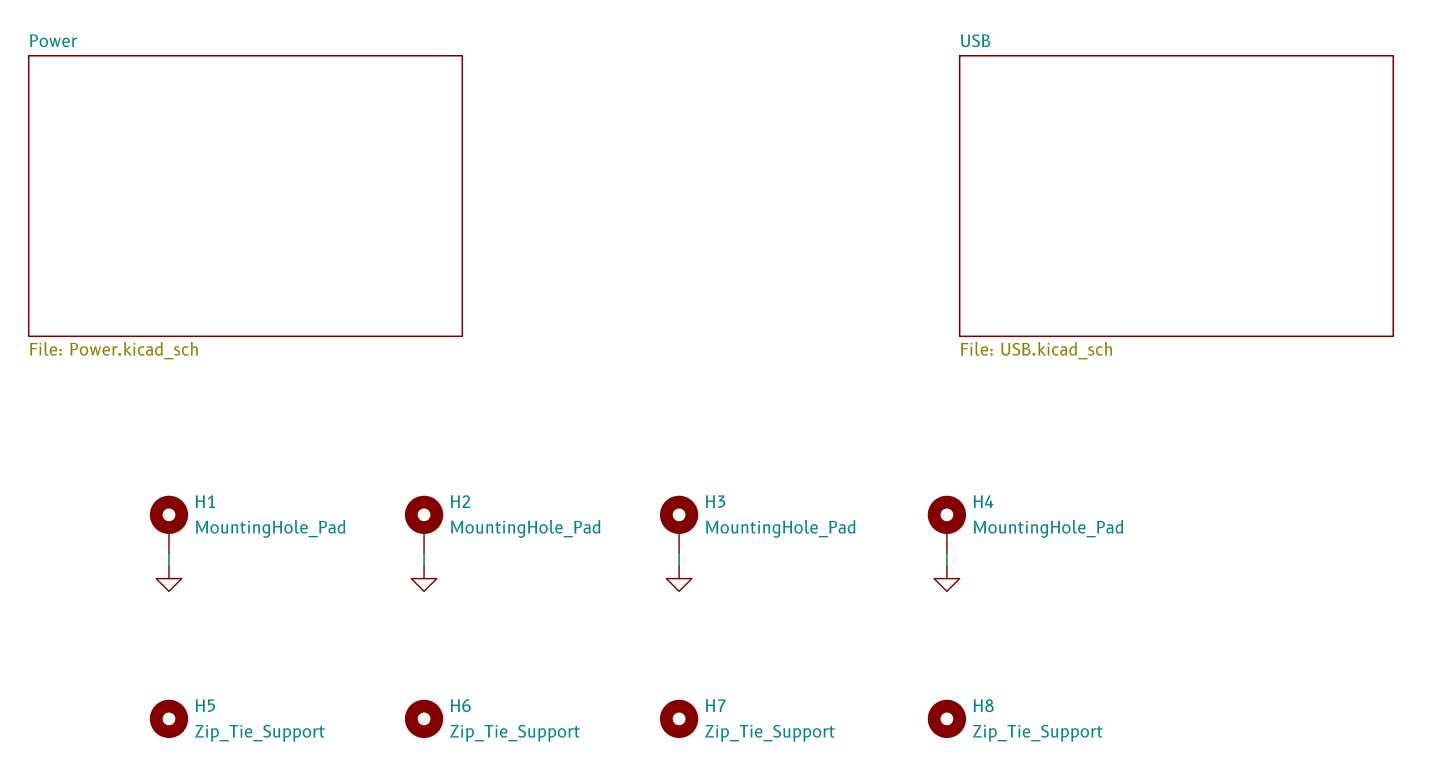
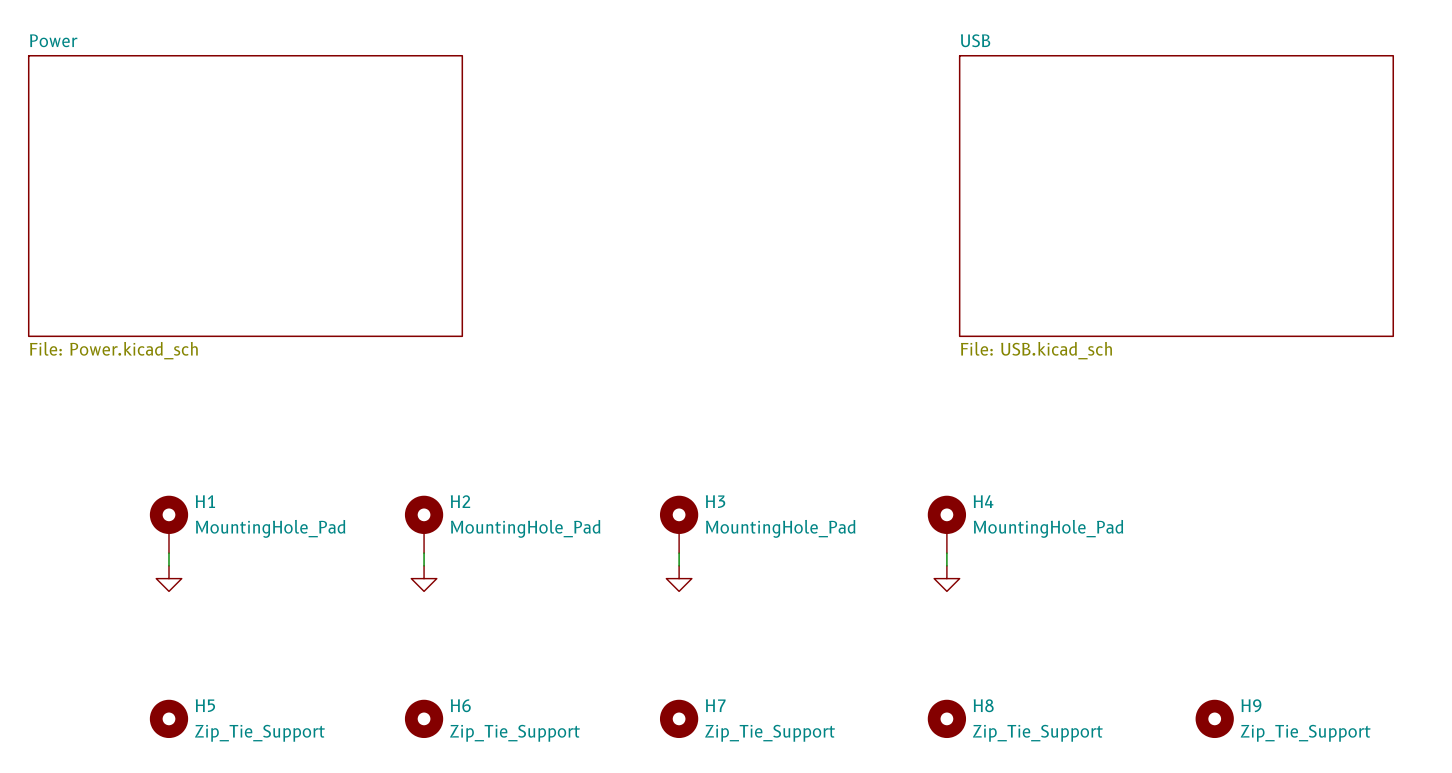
H9: none -> Zip_Tie_Support (1214, 718)

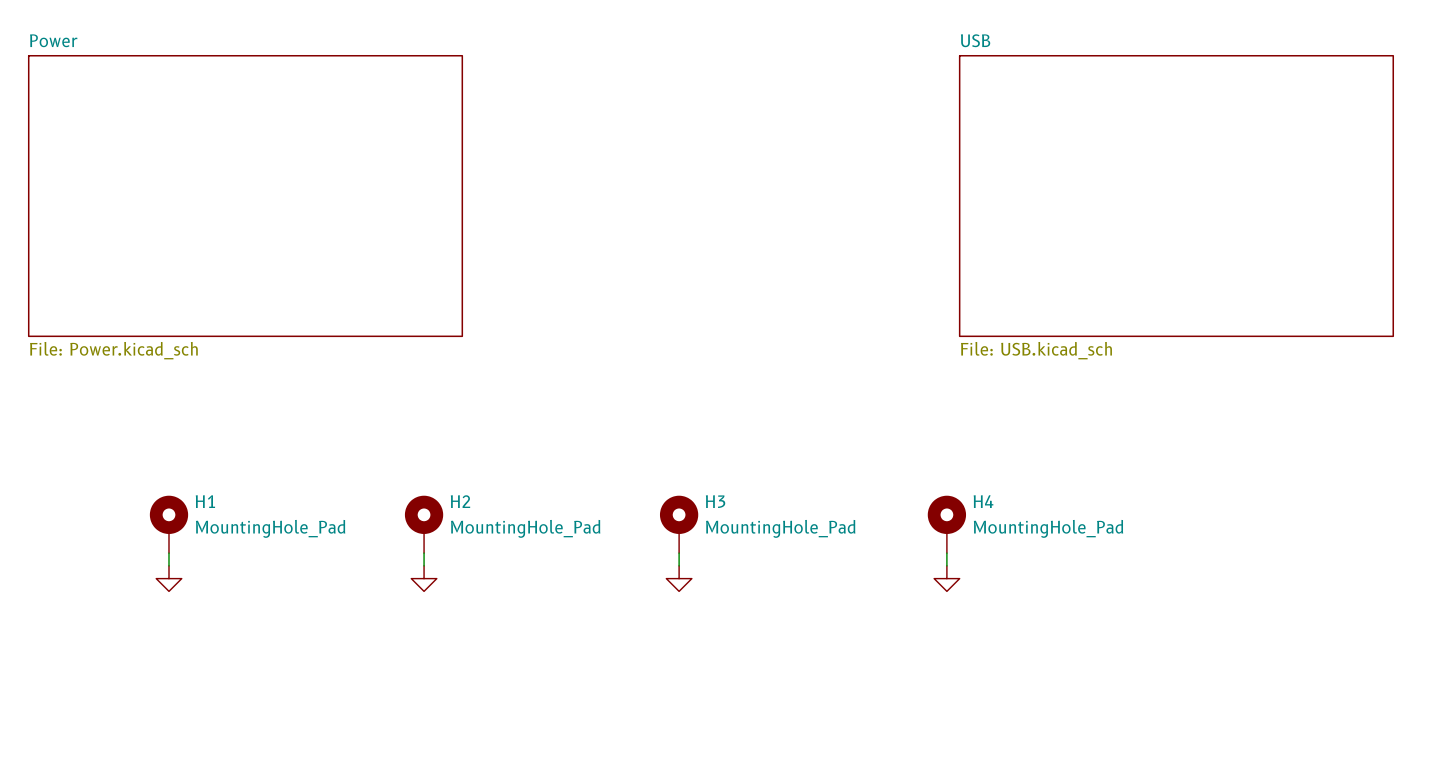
H5: Zip_Tie_Support (168, 718) -> none
H6: Zip_Tie_Support (424, 718) -> none
H7: Zip_Tie_Support (679, 718) -> none
H8: Zip_Tie_Support (946, 718) -> none
H9: Zip_Tie_Support (1214, 718) -> none

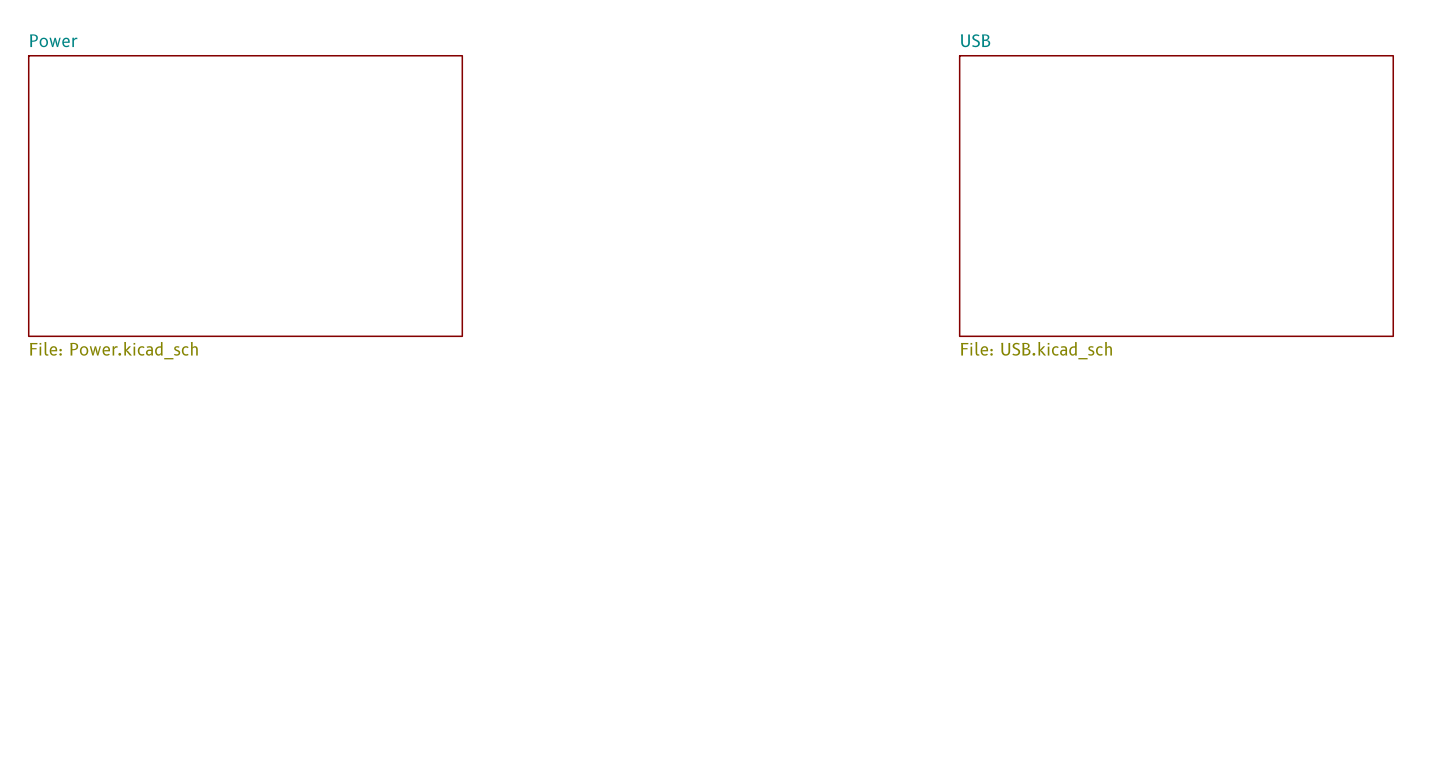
H1: MountingHole_Pad (168, 524) -> none
H2: MountingHole_Pad (424, 524) -> none
H3: MountingHole_Pad (679, 524) -> none
H4: MountingHole_Pad (946, 524) -> none
wire: (168, 553) (168, 565) -> none
wire: (424, 553) (424, 565) -> none
wire: (679, 553) (679, 565) -> none
wire: (946, 553) (946, 565) -> none
power symbol: (168, 578) -> none
power symbol: (424, 578) -> none
power symbol: (679, 578) -> none
power symbol: (946, 578) -> none

